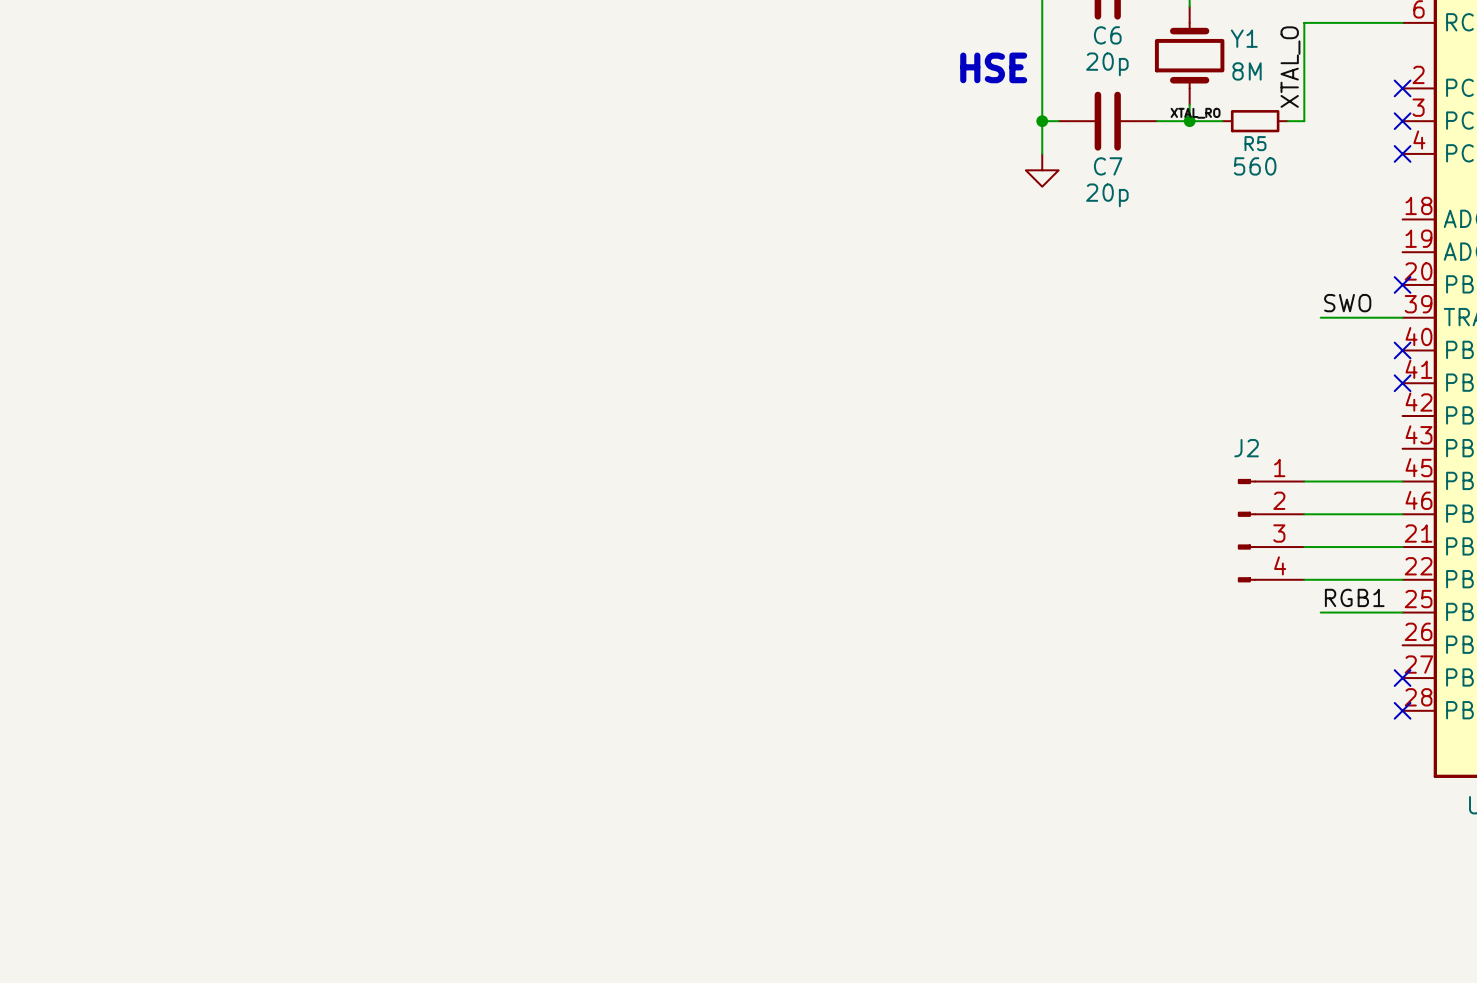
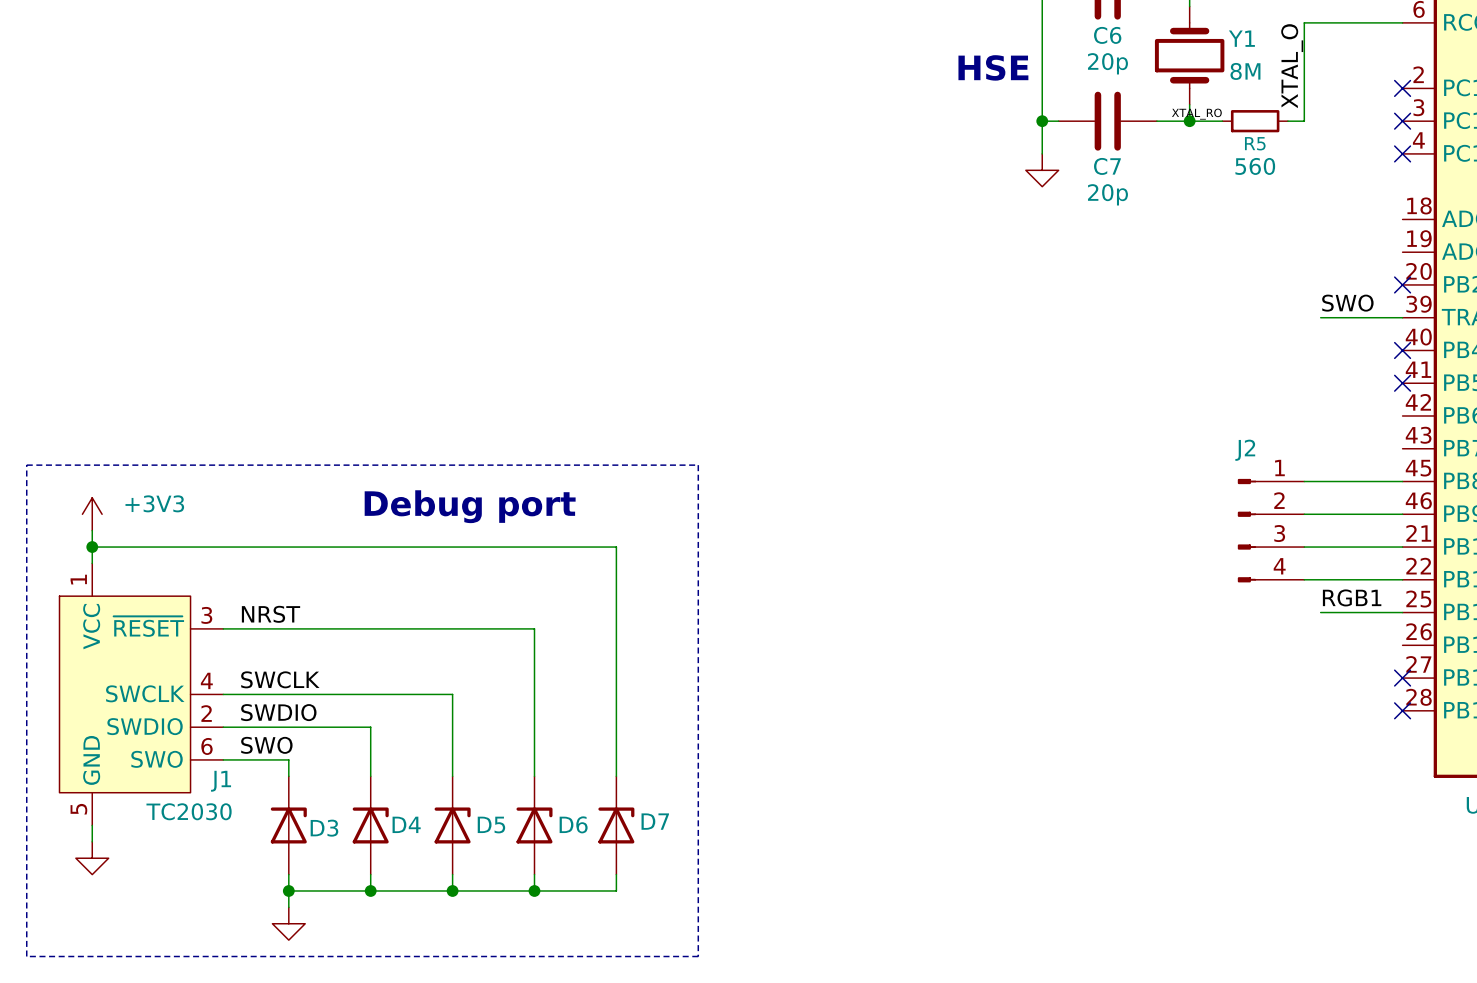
line: none -> (26, 465) (26, 956) (698, 956) (698, 465) (26, 465)
text: none -> Debug port (470, 506)
power symbol: none -> +3V3 (92, 514)
wire: none -> (92, 530) (92, 563)
wire: none -> (92, 547) (616, 547) (616, 776)
junction: none -> (92, 547)
label: none -> NRST (271, 614)
wire: none -> (223, 628) (534, 628) (534, 776)
label: none -> SWCLK (280, 679)
J1: none -> TC2030 (141, 694)
wire: none -> (223, 694) (452, 694) (452, 776)
label: none -> SWDIO (278, 712)
wire: none -> (223, 727) (370, 727) (370, 776)
label: none -> SWO (266, 745)
wire: none -> (223, 759) (288, 759) (288, 776)
wire: none -> (92, 825) (92, 841)
D3: none -> (288, 825)
D4: none -> (370, 825)
D5: none -> (452, 825)
D6: none -> (534, 825)
D7: none -> (616, 825)
power symbol: none -> (92, 858)
wire: none -> (288, 874) (288, 907)
wire: none -> (370, 874) (370, 890)
wire: none -> (452, 874) (452, 890)
wire: none -> (534, 874) (534, 890)
wire: none -> (616, 874) (616, 890) (288, 890)
junction: none -> (288, 890)
junction: none -> (370, 890)
junction: none -> (452, 890)
junction: none -> (534, 890)
power symbol: none -> (288, 923)

